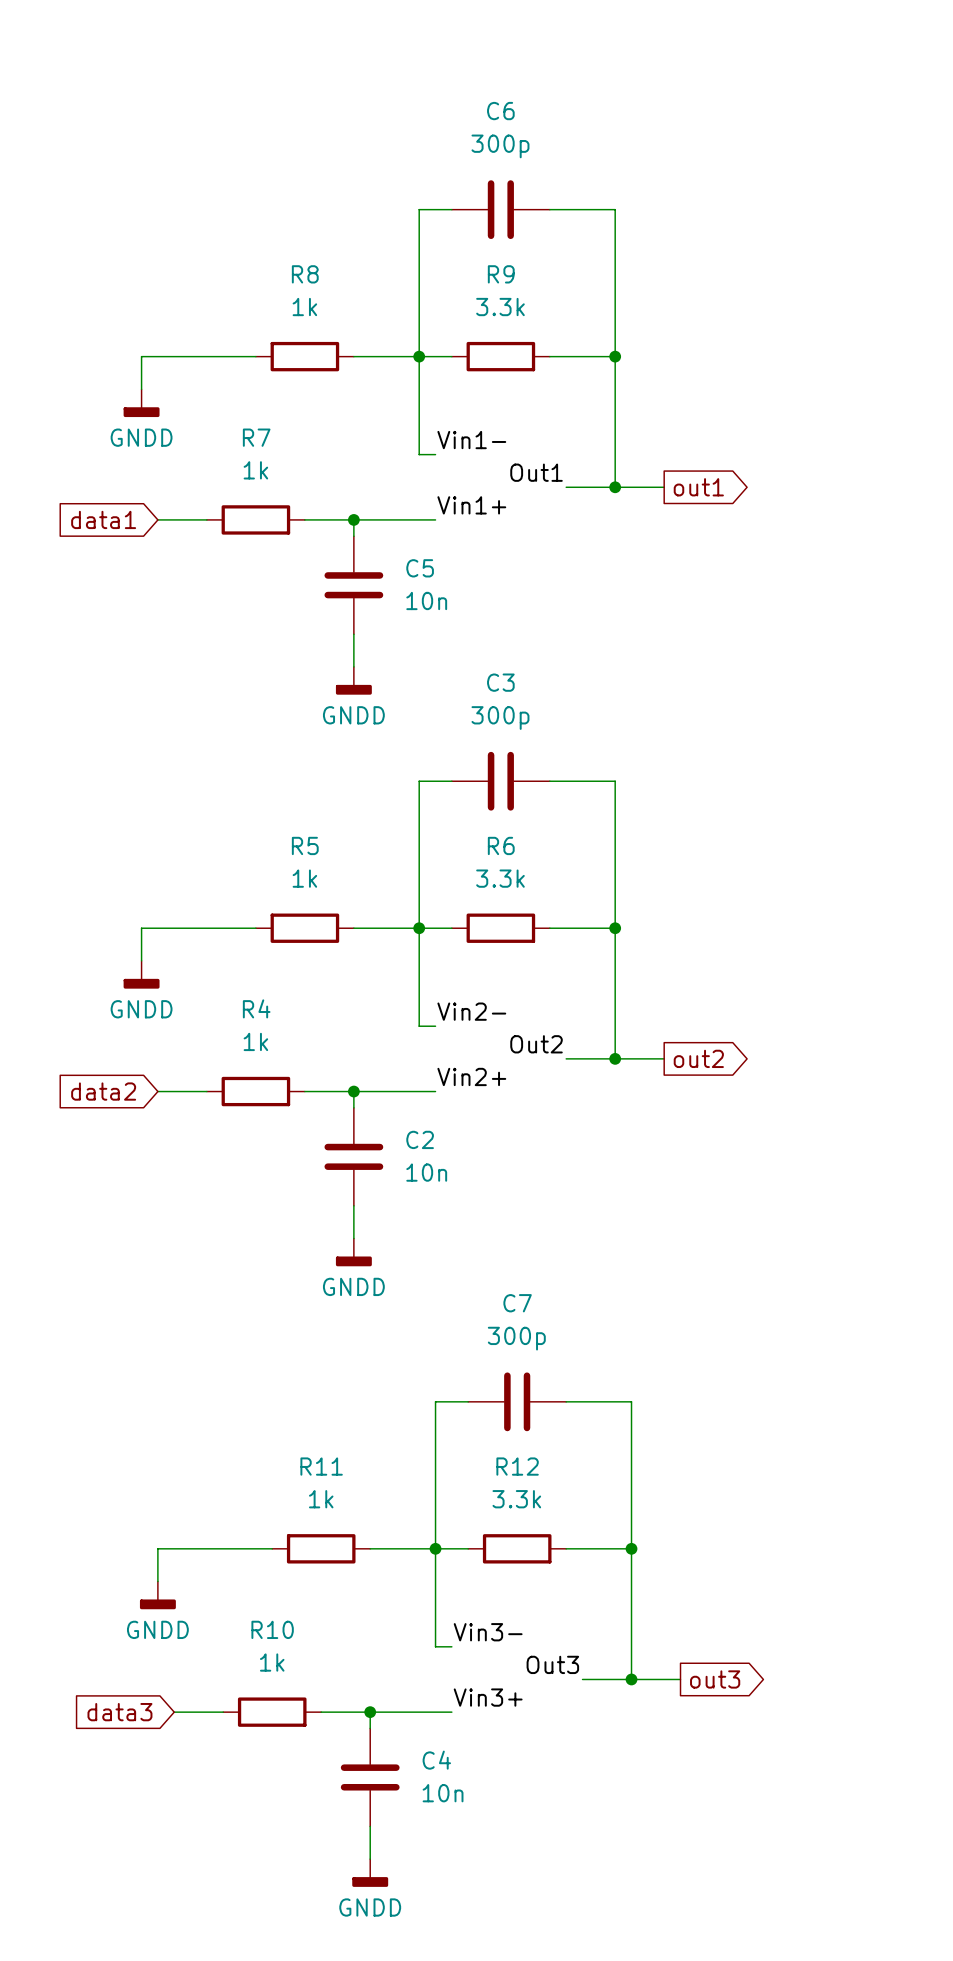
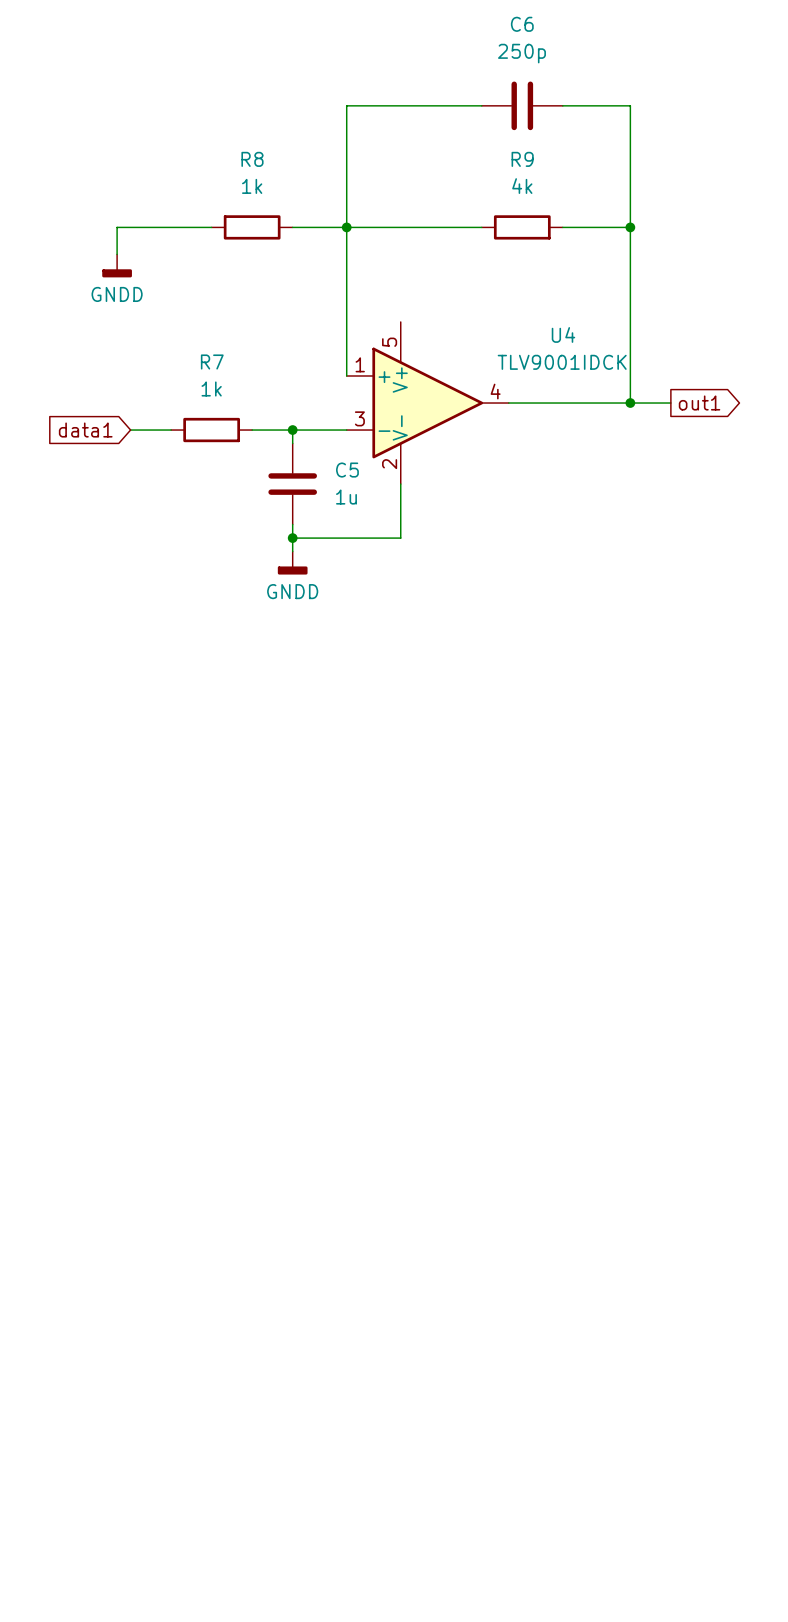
wire: none -> (562, 105) (630, 105) (630, 403)
C6 value: 300p (500, 146) -> 250p (521, 53)
wire: (419, 209) (451, 209) -> (346, 173) (346, 105) (481, 105)
C6 position: (500, 209) -> (522, 105)
wire: (549, 209) (615, 209) (615, 487) (566, 487) -> none
wire: none -> (292, 227) (481, 227)
junction: none -> (346, 227)
wire: none -> (562, 227) (630, 227)
junction: none -> (630, 227)
R9 value: 3.3k (500, 307) -> 4k (522, 186)
wire: (255, 356) (141, 356) (141, 389) -> (211, 227) (117, 227) (117, 254)
R8 position: (304, 356) -> (252, 227)
wire: (353, 356) (451, 356) -> none
junction: (419, 356) -> none
R9 position: (500, 356) -> (522, 227)
wire: (549, 356) (615, 356) -> none
junction: (615, 356) -> none
power symbol position: GNDD (141, 403) -> GNDD (117, 265)
label: Vin1- (471, 440) -> none
label: Out1 (536, 472) -> none
U4: none -> TLV9001IDCK (427, 403)
junction: (615, 487) -> none
wire: none -> (549, 403) (670, 403)
global label position: out1 (698, 487) -> out1 (699, 403)
junction: none -> (630, 403)
label: Vin1+ (471, 505) -> none
wire: none -> (400, 484) (400, 538) (292, 538)
C5 value: 10n (426, 600) -> 1u (346, 497)
junction: none -> (292, 538)
wire: (451, 781) (419, 781) (419, 1026) (435, 1026) -> none
C3: 300p (500, 781) -> none
wire: (549, 781) (615, 781) (615, 1058) -> none
wire: (255, 928) (141, 928) (141, 960) -> none
R5: 1k (304, 928) -> none
wire: (353, 928) (451, 928) -> none
junction: (419, 928) -> none
R6: 3.3k (500, 928) -> none
wire: (549, 928) (615, 928) -> none
junction: (615, 928) -> none
power symbol: GNDD (141, 974) -> none
label: Vin2- (471, 1011) -> none
label: Out2 (536, 1044) -> none
wire: (566, 1058) (664, 1058) -> none
junction: (615, 1058) -> none
global label: out2 (698, 1058) -> none
label: Vin2+ (471, 1076) -> none
global label: data2 (103, 1091) -> none
wire: (157, 1091) (206, 1091) -> none
R4: 1k (255, 1091) -> none
wire: (304, 1091) (435, 1091) -> none
wire: (353, 1091) (353, 1107) -> none
junction: (353, 1091) -> none
C2: 10n (353, 1156) -> none
wire: (353, 1205) (353, 1238) -> none
power symbol: GNDD (353, 1252) -> none
wire: (468, 1401) (435, 1401) (435, 1646) (451, 1646) -> none
C7: 300p (517, 1401) -> none
wire: (566, 1401) (631, 1401) (631, 1679) -> none
wire: (272, 1548) (157, 1548) (157, 1581) -> none
R11: 1k (321, 1548) -> none
wire: (370, 1548) (468, 1548) -> none
junction: (435, 1548) -> none
R12: 3.3k (517, 1548) -> none
wire: (566, 1548) (631, 1548) -> none
junction: (631, 1548) -> none
power symbol: GNDD (157, 1595) -> none
label: Vin3- (488, 1632) -> none
label: Out3 (552, 1664) -> none
wire: (582, 1679) (680, 1679) -> none
junction: (631, 1679) -> none
global label: out3 (715, 1679) -> none
label: Vin3+ (488, 1697) -> none
global label: data3 (119, 1712) -> none
wire: (174, 1712) (223, 1712) -> none
R10: 1k (272, 1712) -> none
wire: (321, 1712) (451, 1712) -> none
wire: (370, 1712) (370, 1728) -> none
junction: (370, 1712) -> none
C4: 10n (370, 1777) -> none
wire: (370, 1826) (370, 1859) -> none
power symbol: GNDD (370, 1873) -> none

